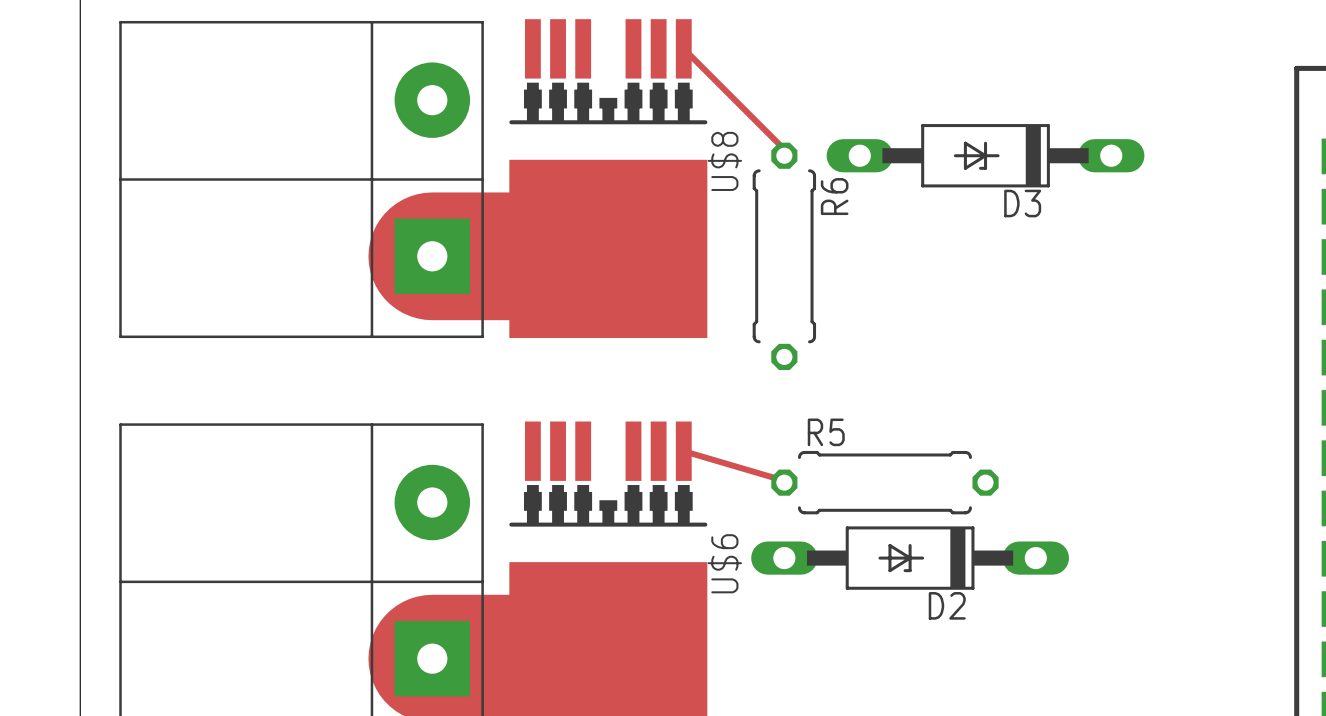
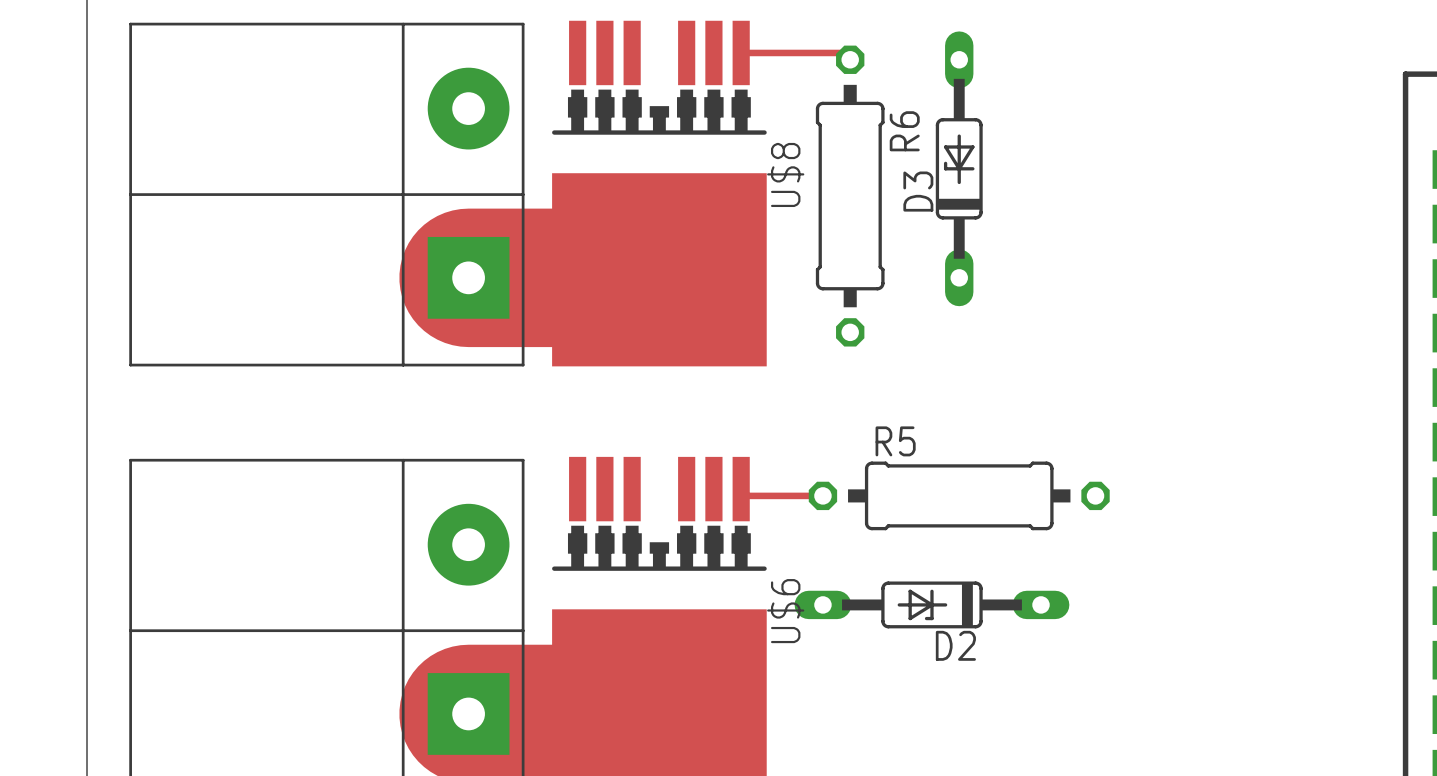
track: (683, 48) (784, 149) (784, 155) -> (741, 52) (850, 52) (850, 59)
D3 footprint: [826, 124, 1145, 188] -> [935, 31, 983, 307]
R6 footprint: [752, 142, 817, 370] -> [815, 45, 885, 347]
D3 name position: D3 (1022, 203) -> D3 (918, 191)
R5 footprint: [771, 450, 999, 515] -> [808, 461, 1110, 531]
track: (683, 451) (790, 482) (784, 482) -> (741, 489) (747, 495) (822, 495)
D2 footprint: [751, 526, 1070, 590] -> [794, 581, 1070, 629]

